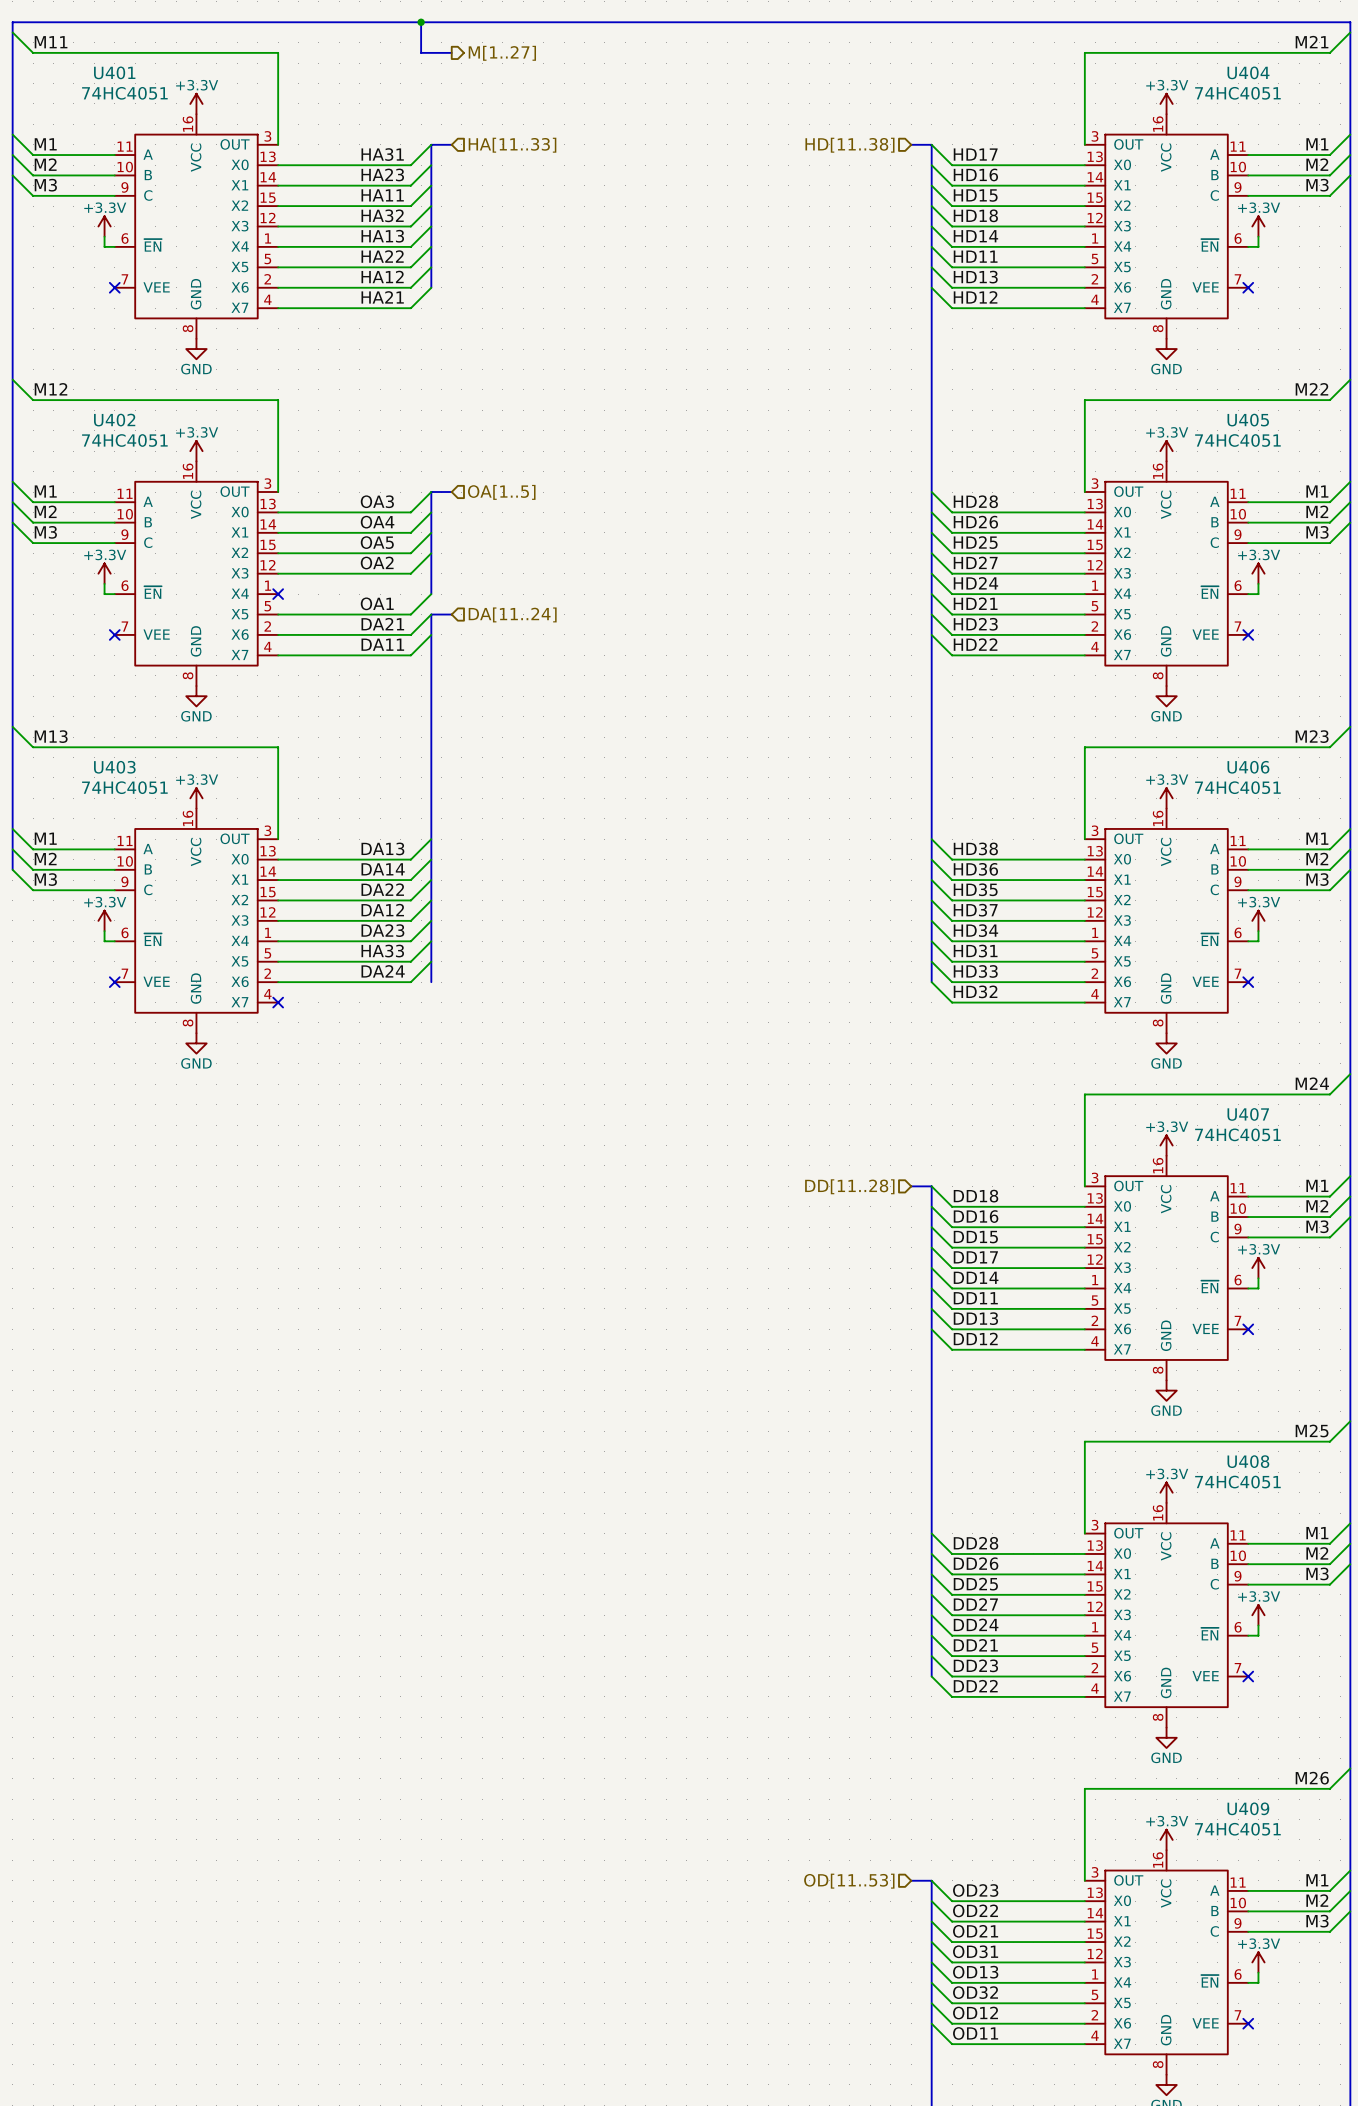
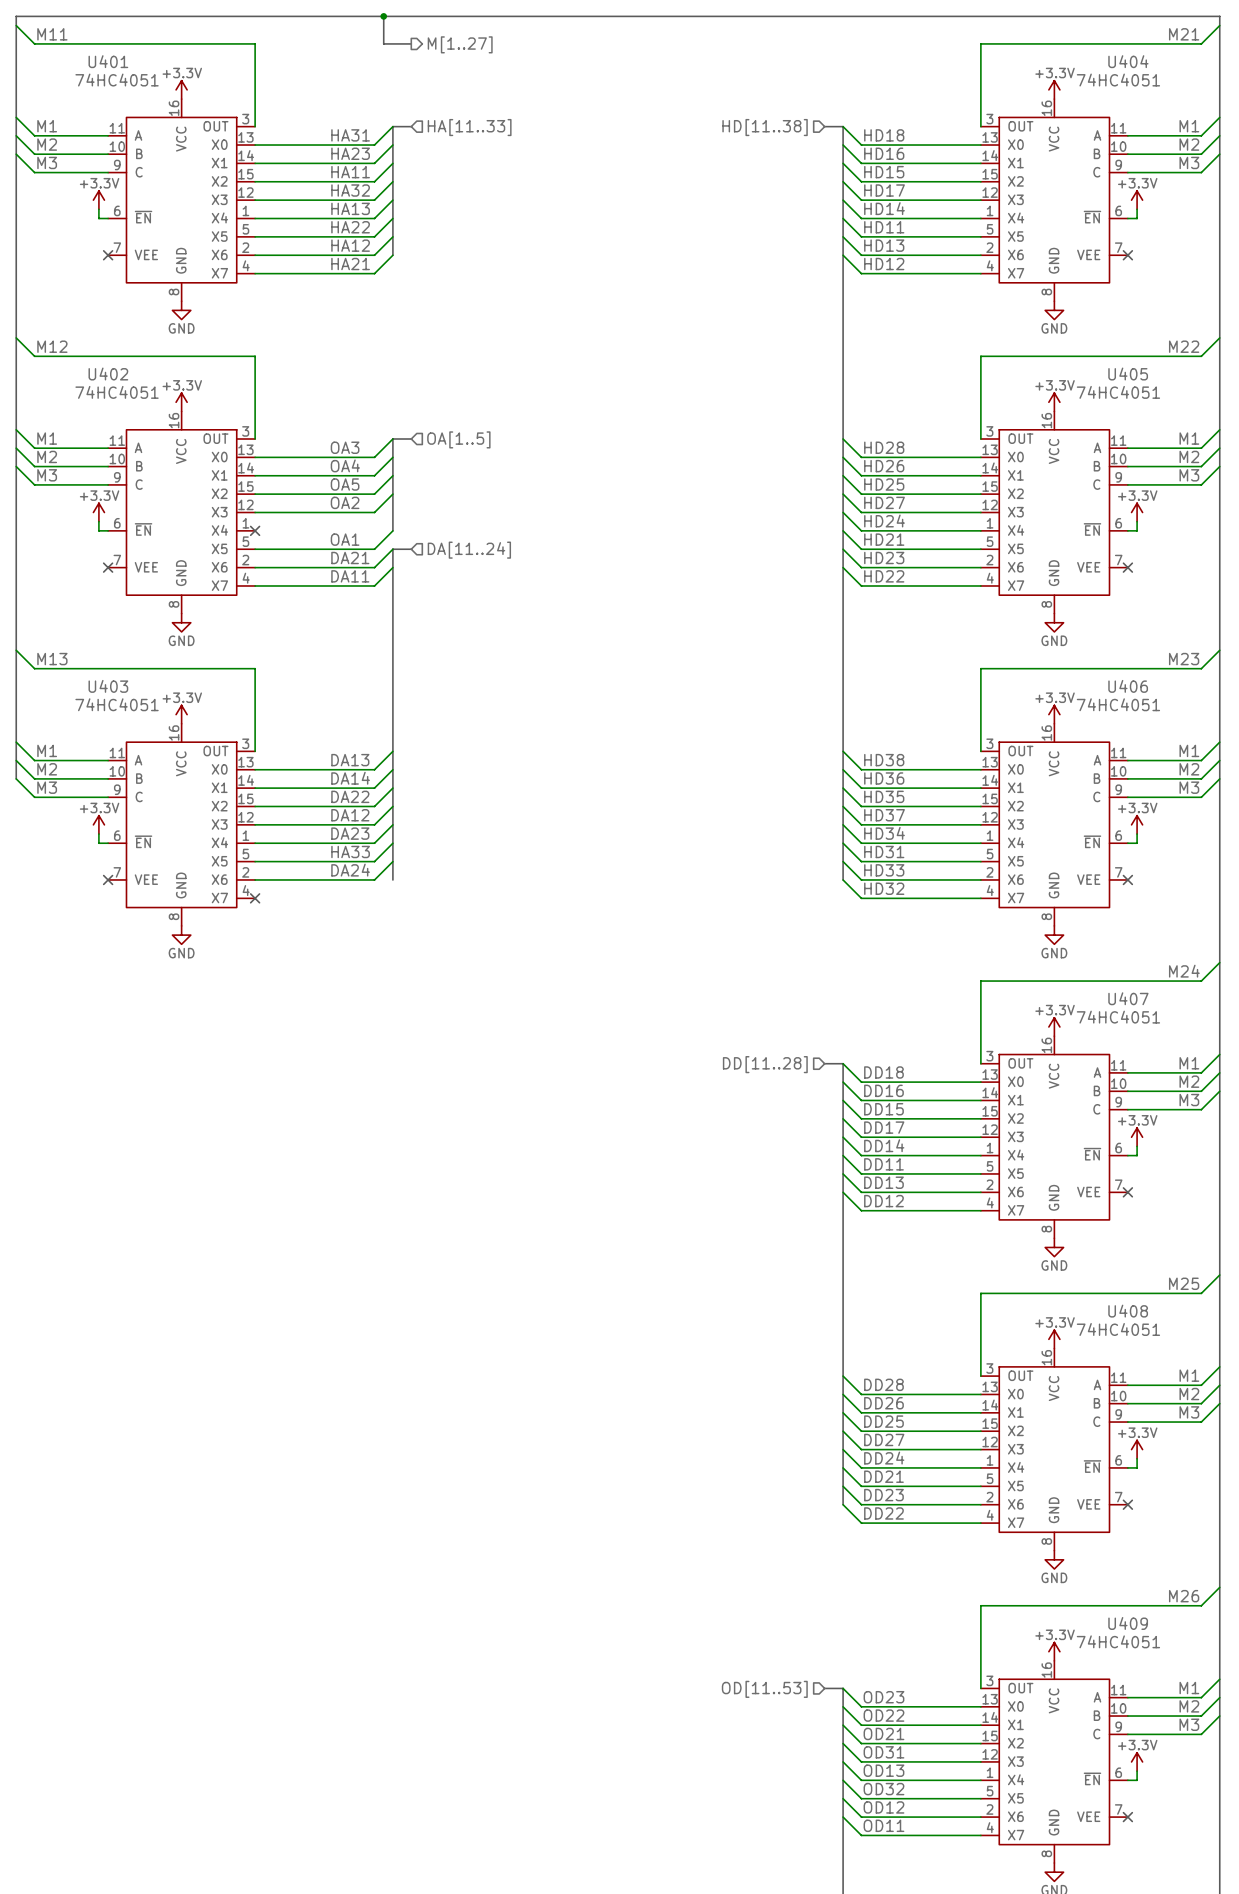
label: HD17 (975, 154) -> HD18 (884, 135)
label: HD18 (975, 215) -> HD17 (884, 190)

